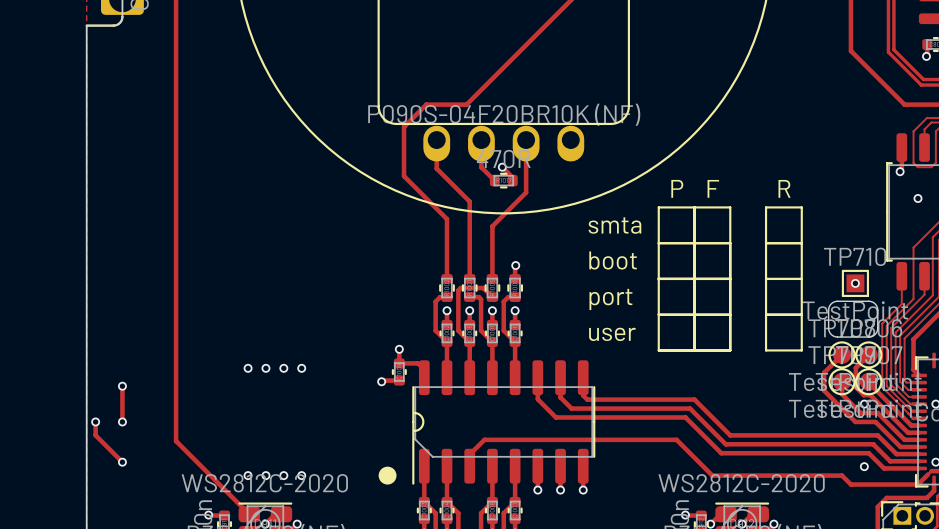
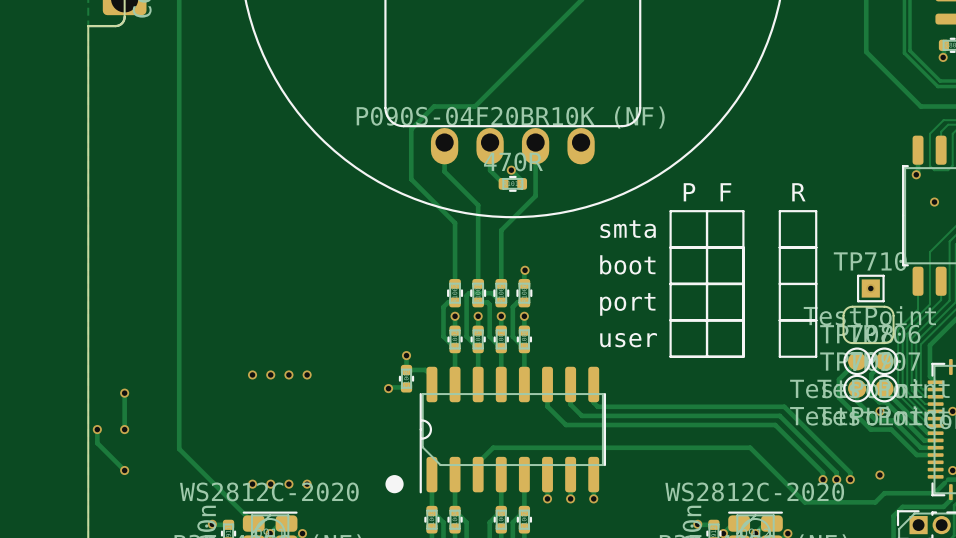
track: (694, 399) (730, 435) (877, 435) (896, 454) (919, 454) -> (707, 406) (784, 406) (850, 472) (850, 479)
track: (690, 408) (725, 444) (873, 444) (890, 461) (919, 461) -> (702, 415) (779, 415) (836, 472) (836, 479)
track: (685, 417) (721, 453) (868, 453) (884, 468) (919, 468) -> (697, 425) (775, 425) (823, 472) (823, 479)
track: (676, 439) (712, 475) (842, 475) (850, 484) (868, 484) -> (688, 447) (750, 447) (804, 502) (875, 502) (884, 493)
via: none -> (823, 479)
via: none -> (836, 479)
via: none -> (850, 479)

